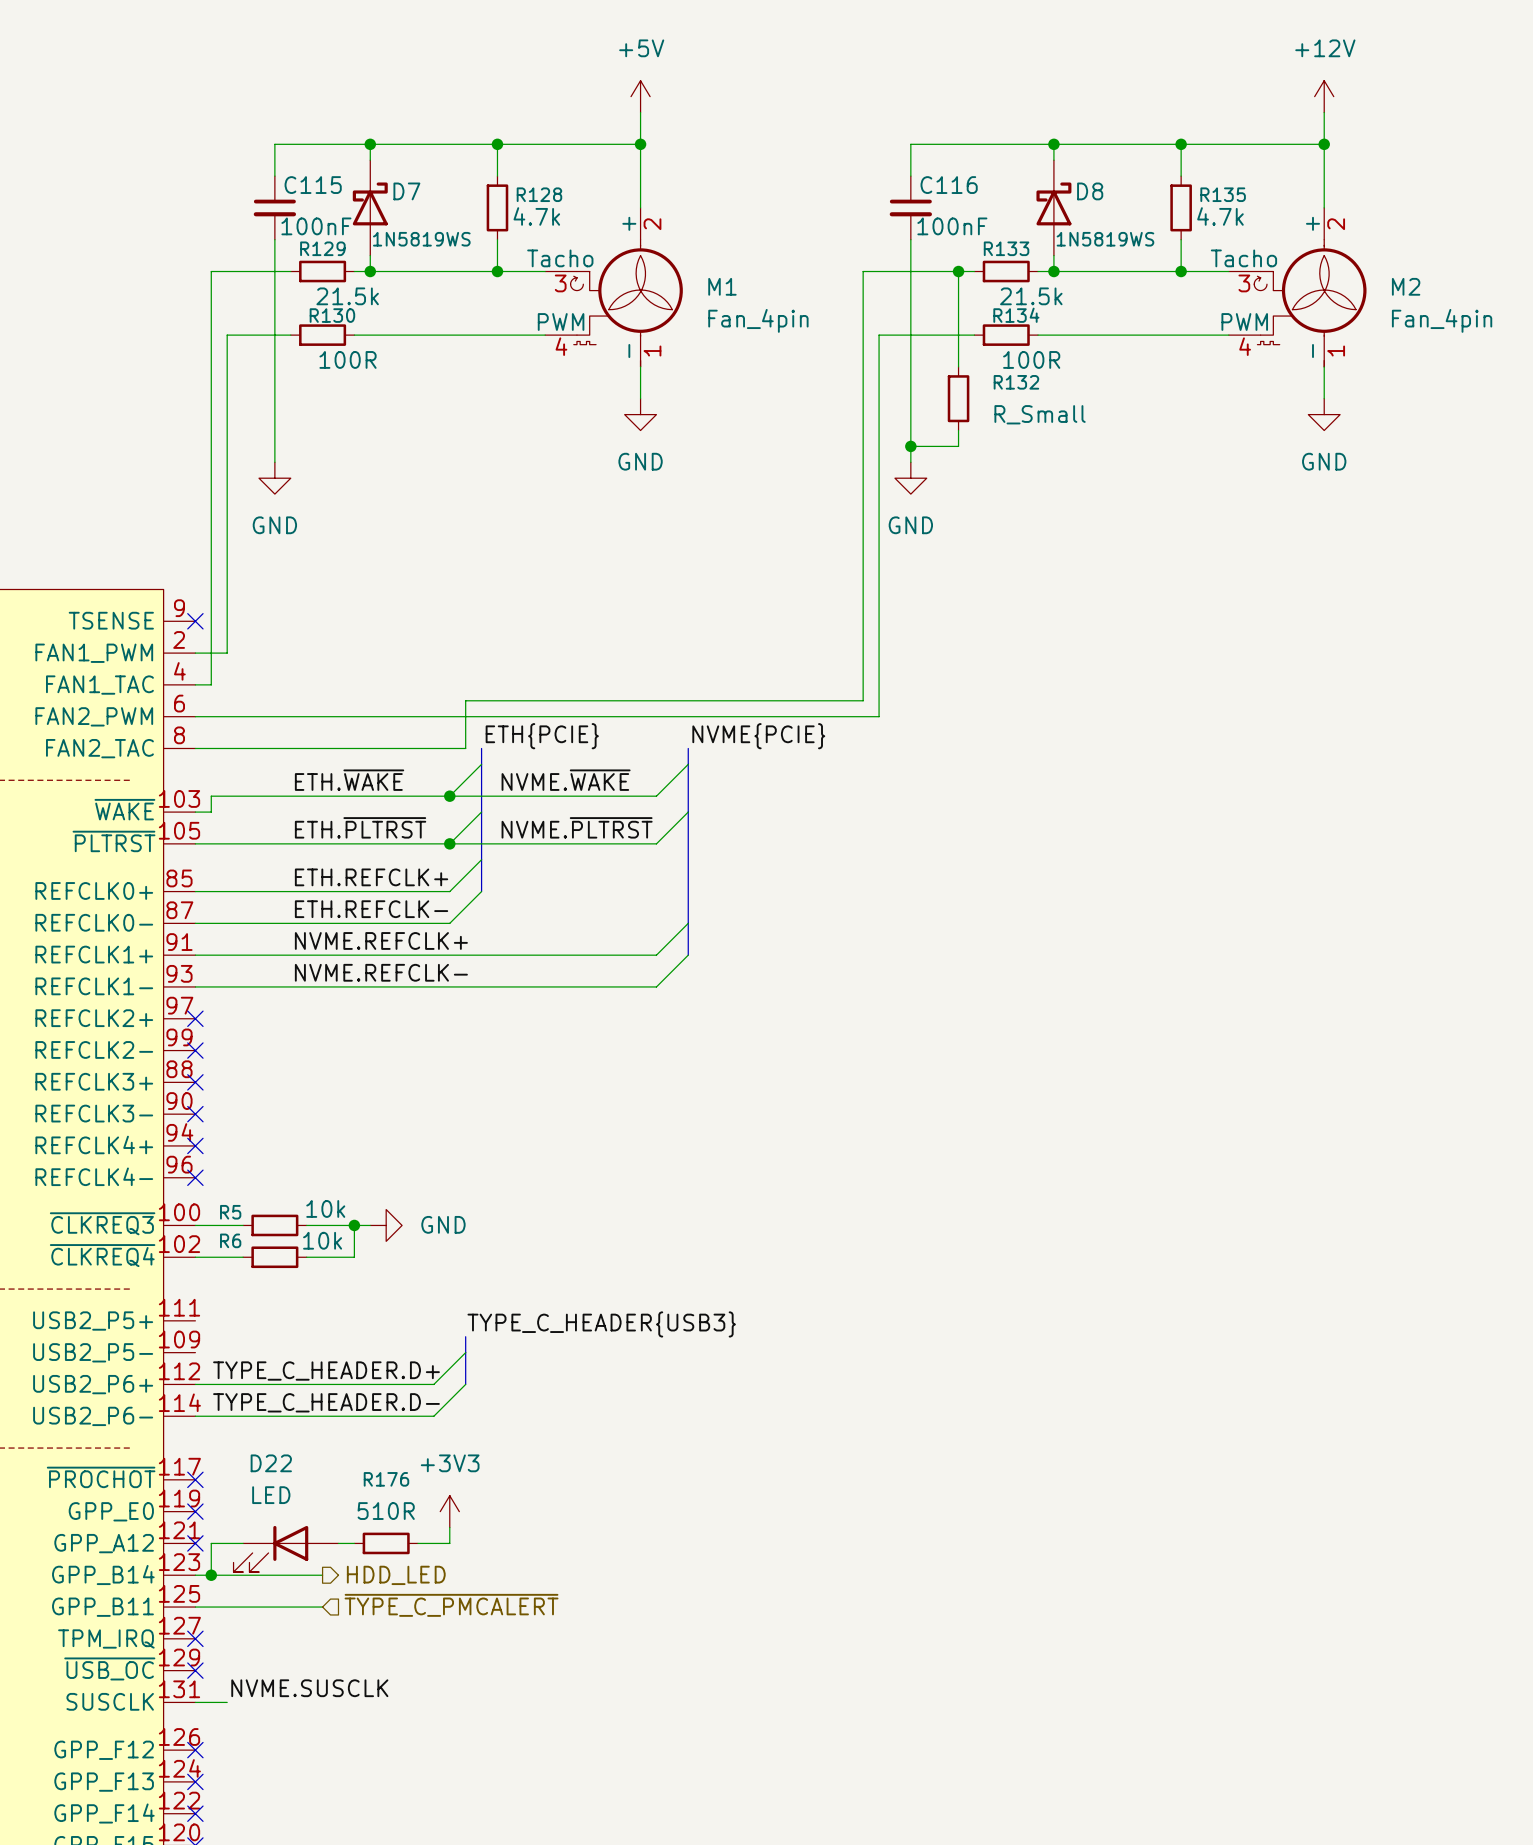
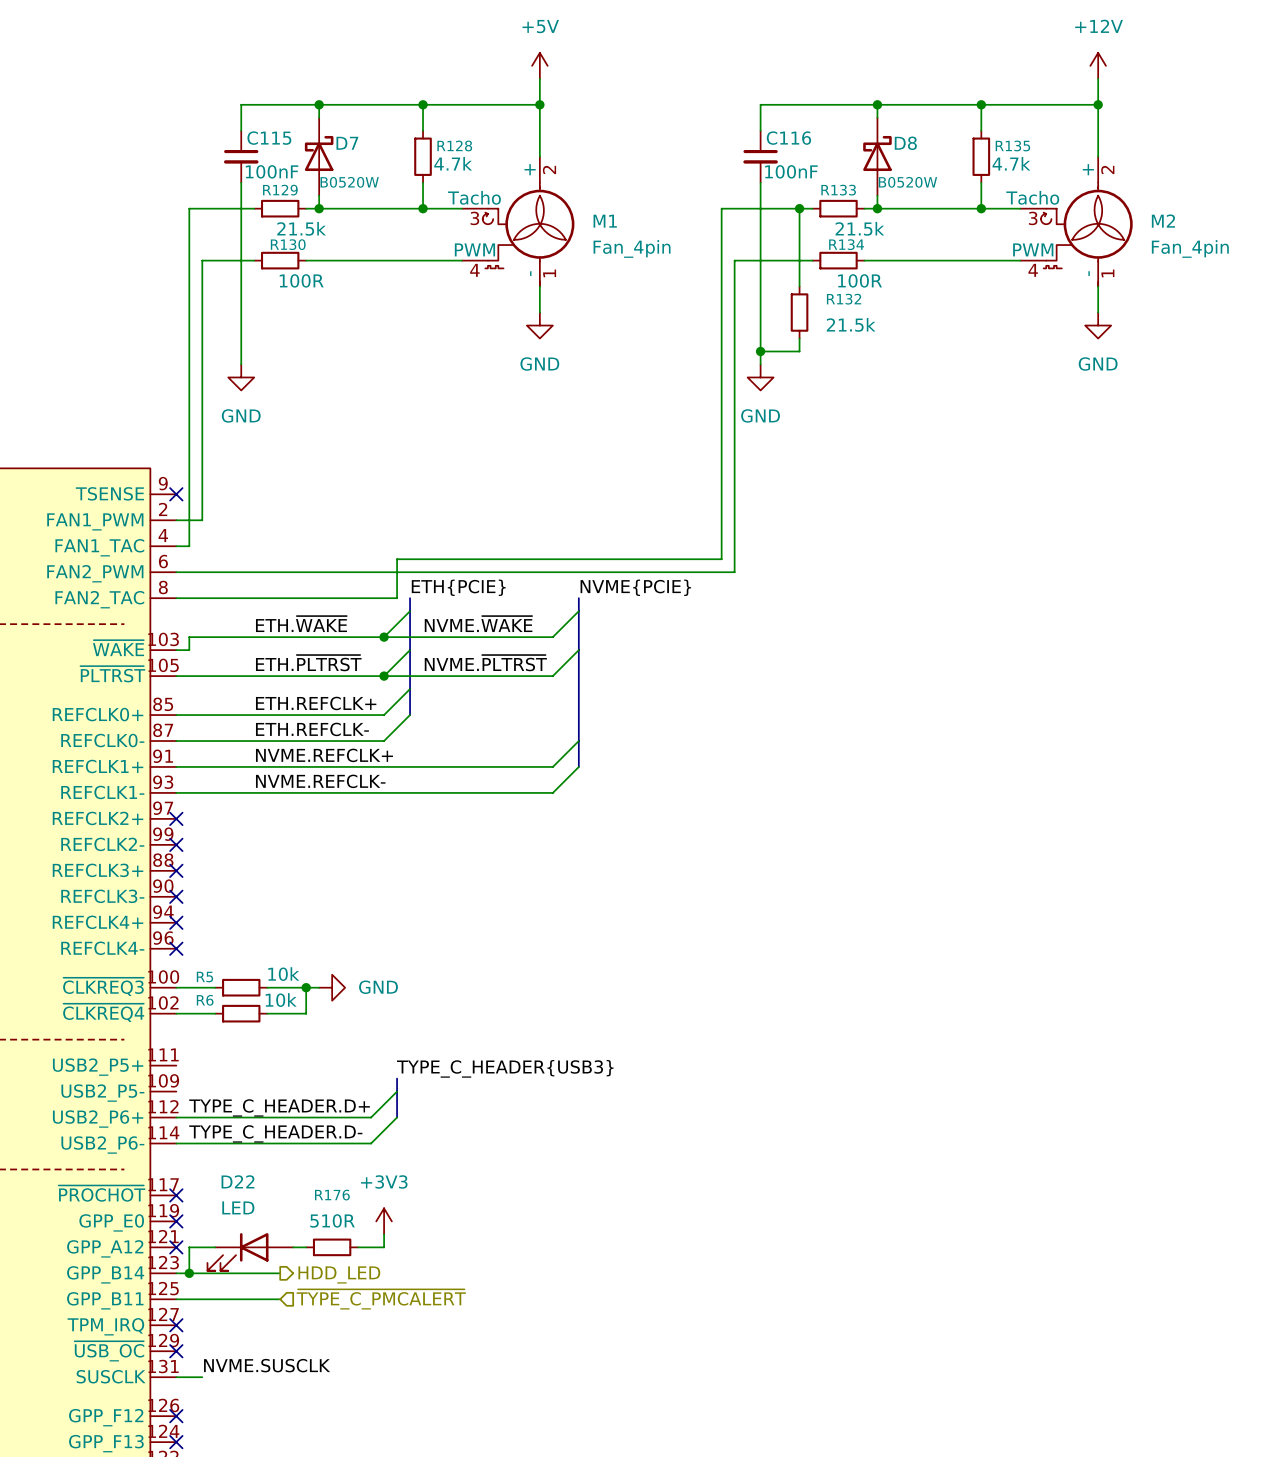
D7 value: 1N5819WS (421, 239) -> B0520W (349, 182)
D8 value: 1N5819WS (1105, 239) -> B0520W (907, 182)
R132 value: R_Small (1040, 414) -> 21.5k (851, 324)

